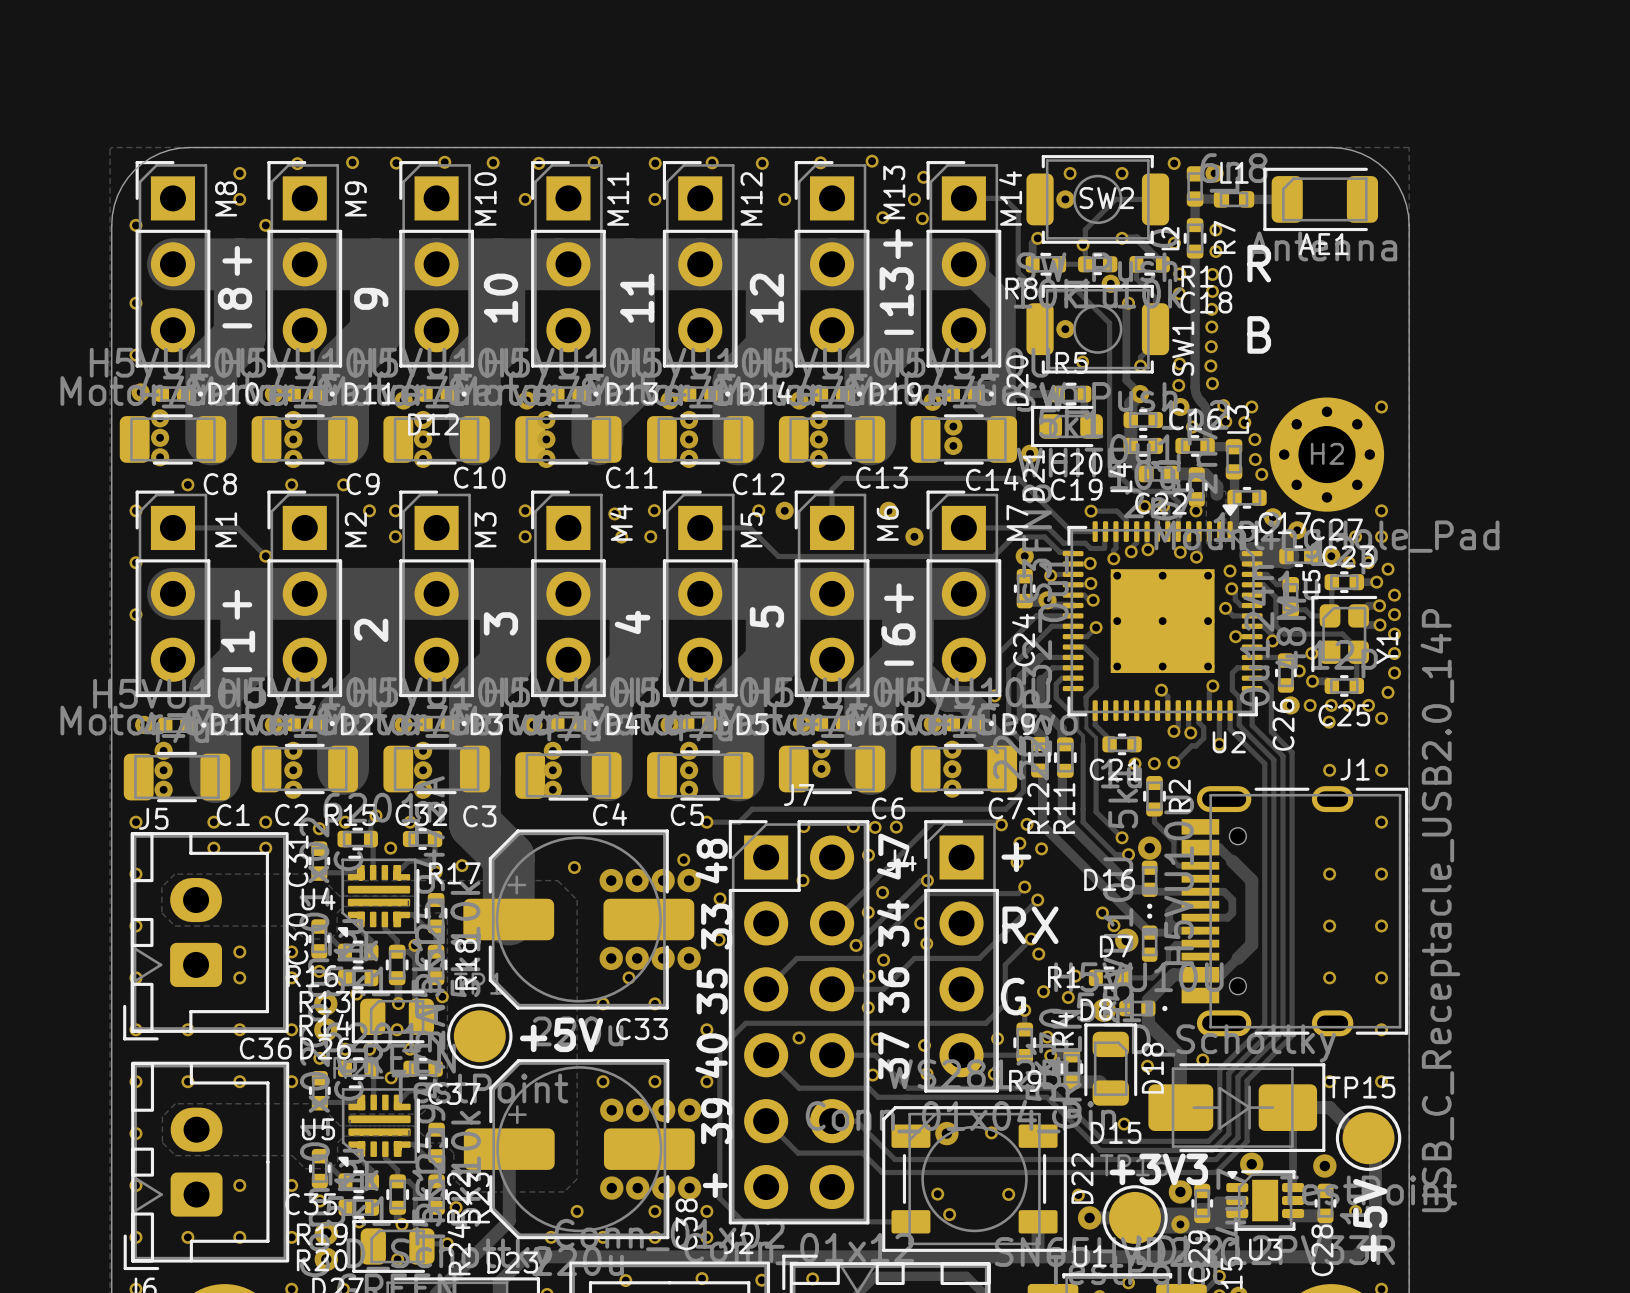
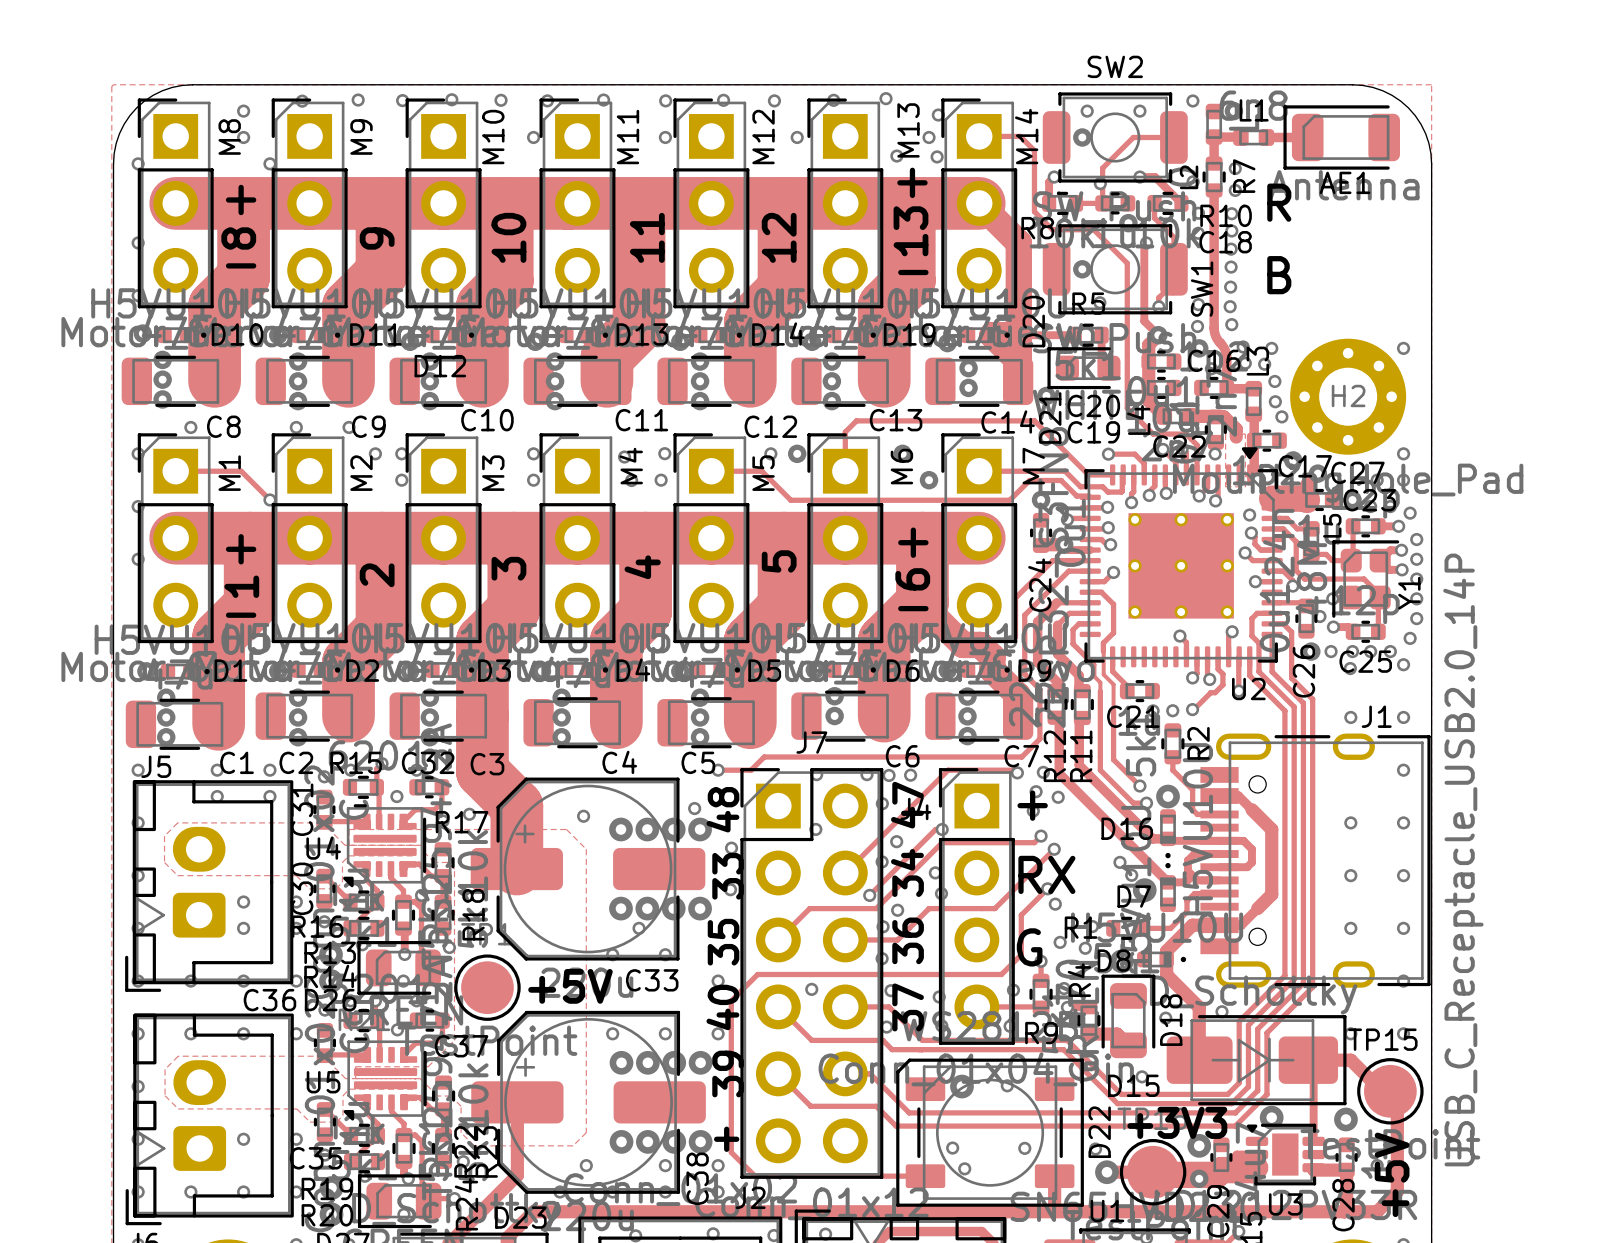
SW2 name position: SW2 (1106, 198) -> SW2 (1115, 66)

